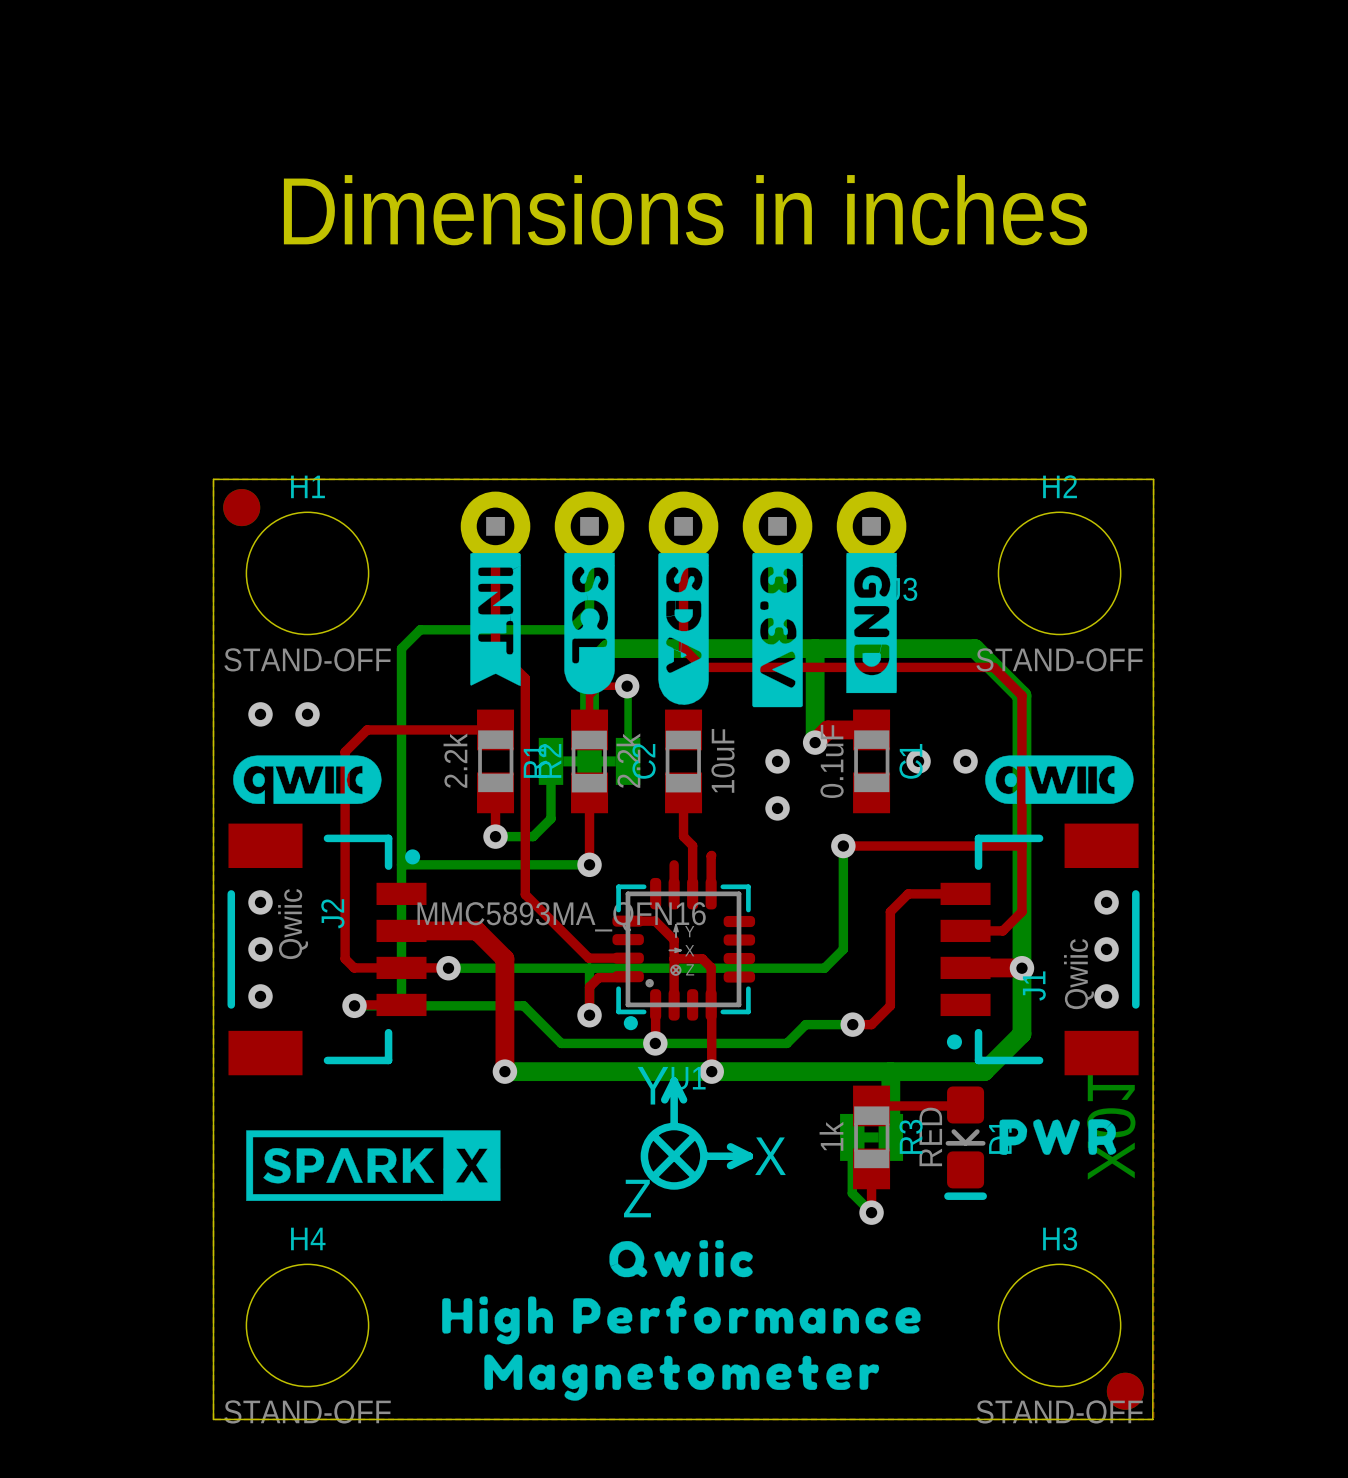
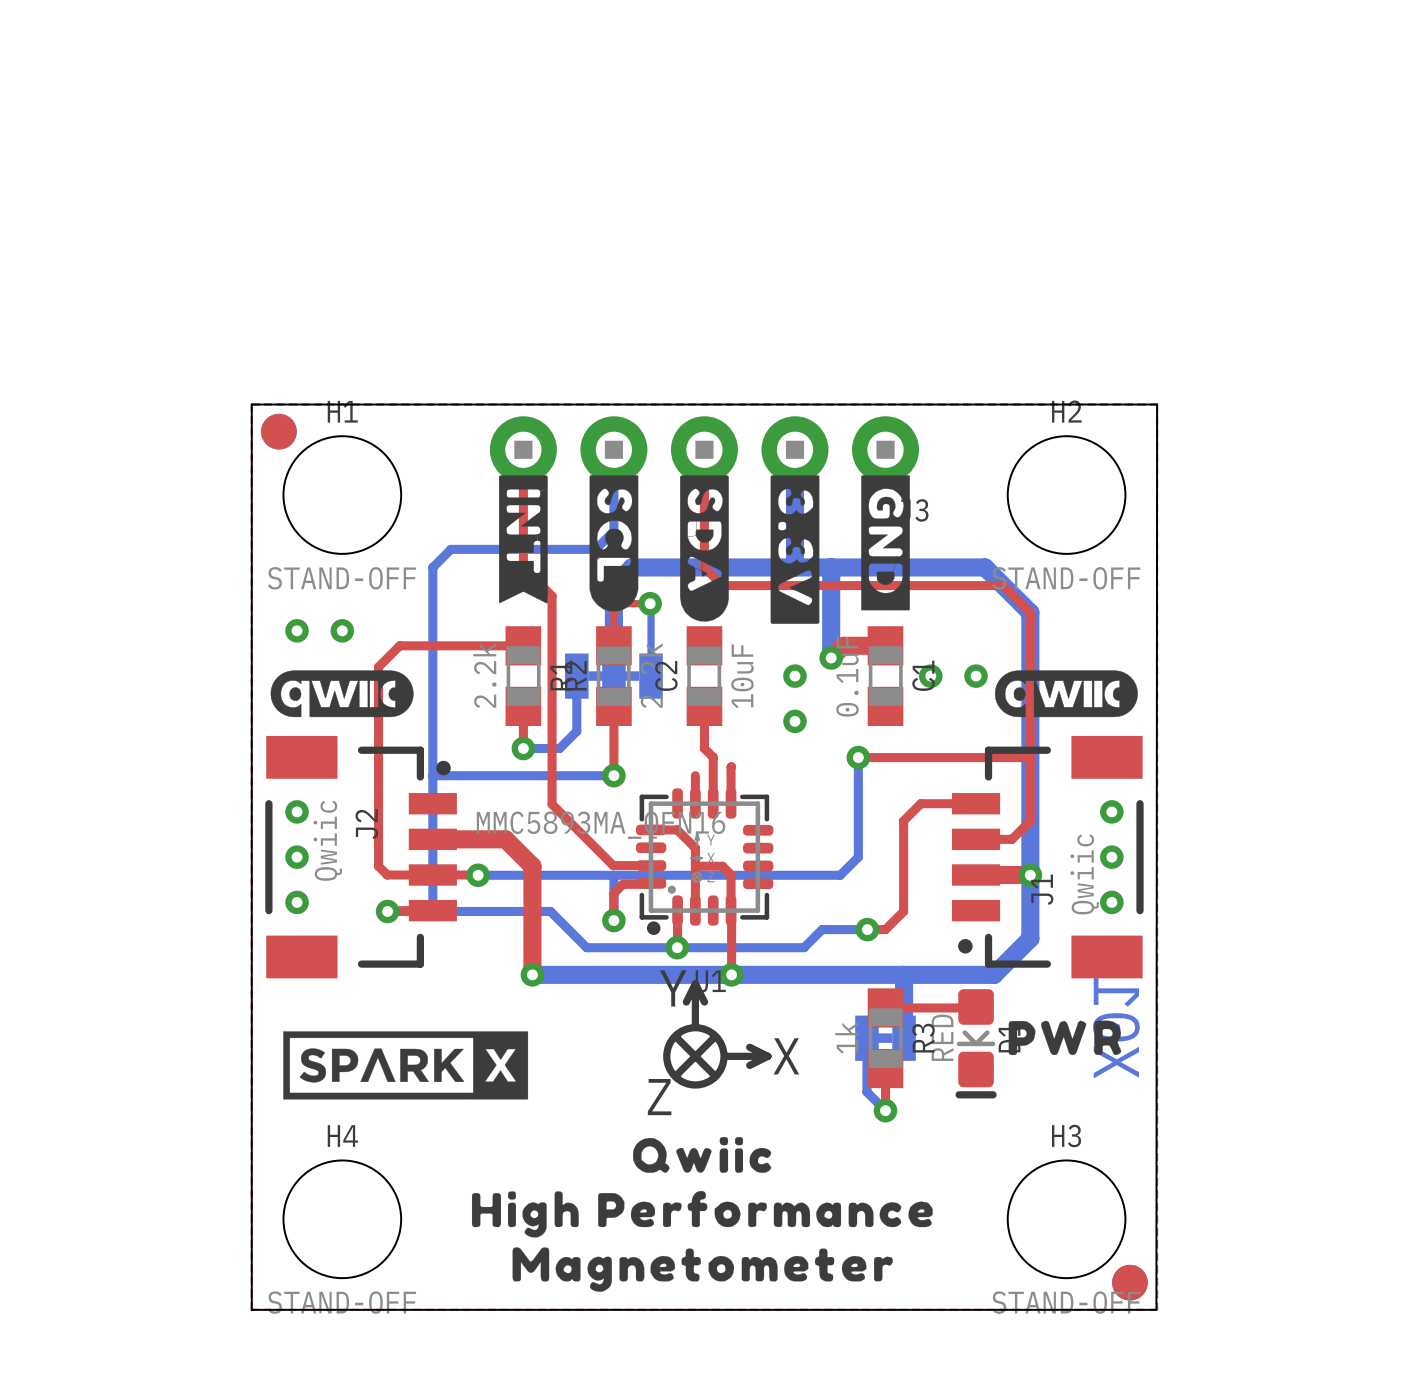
text: Dimensions in inches (685, 210) -> none

